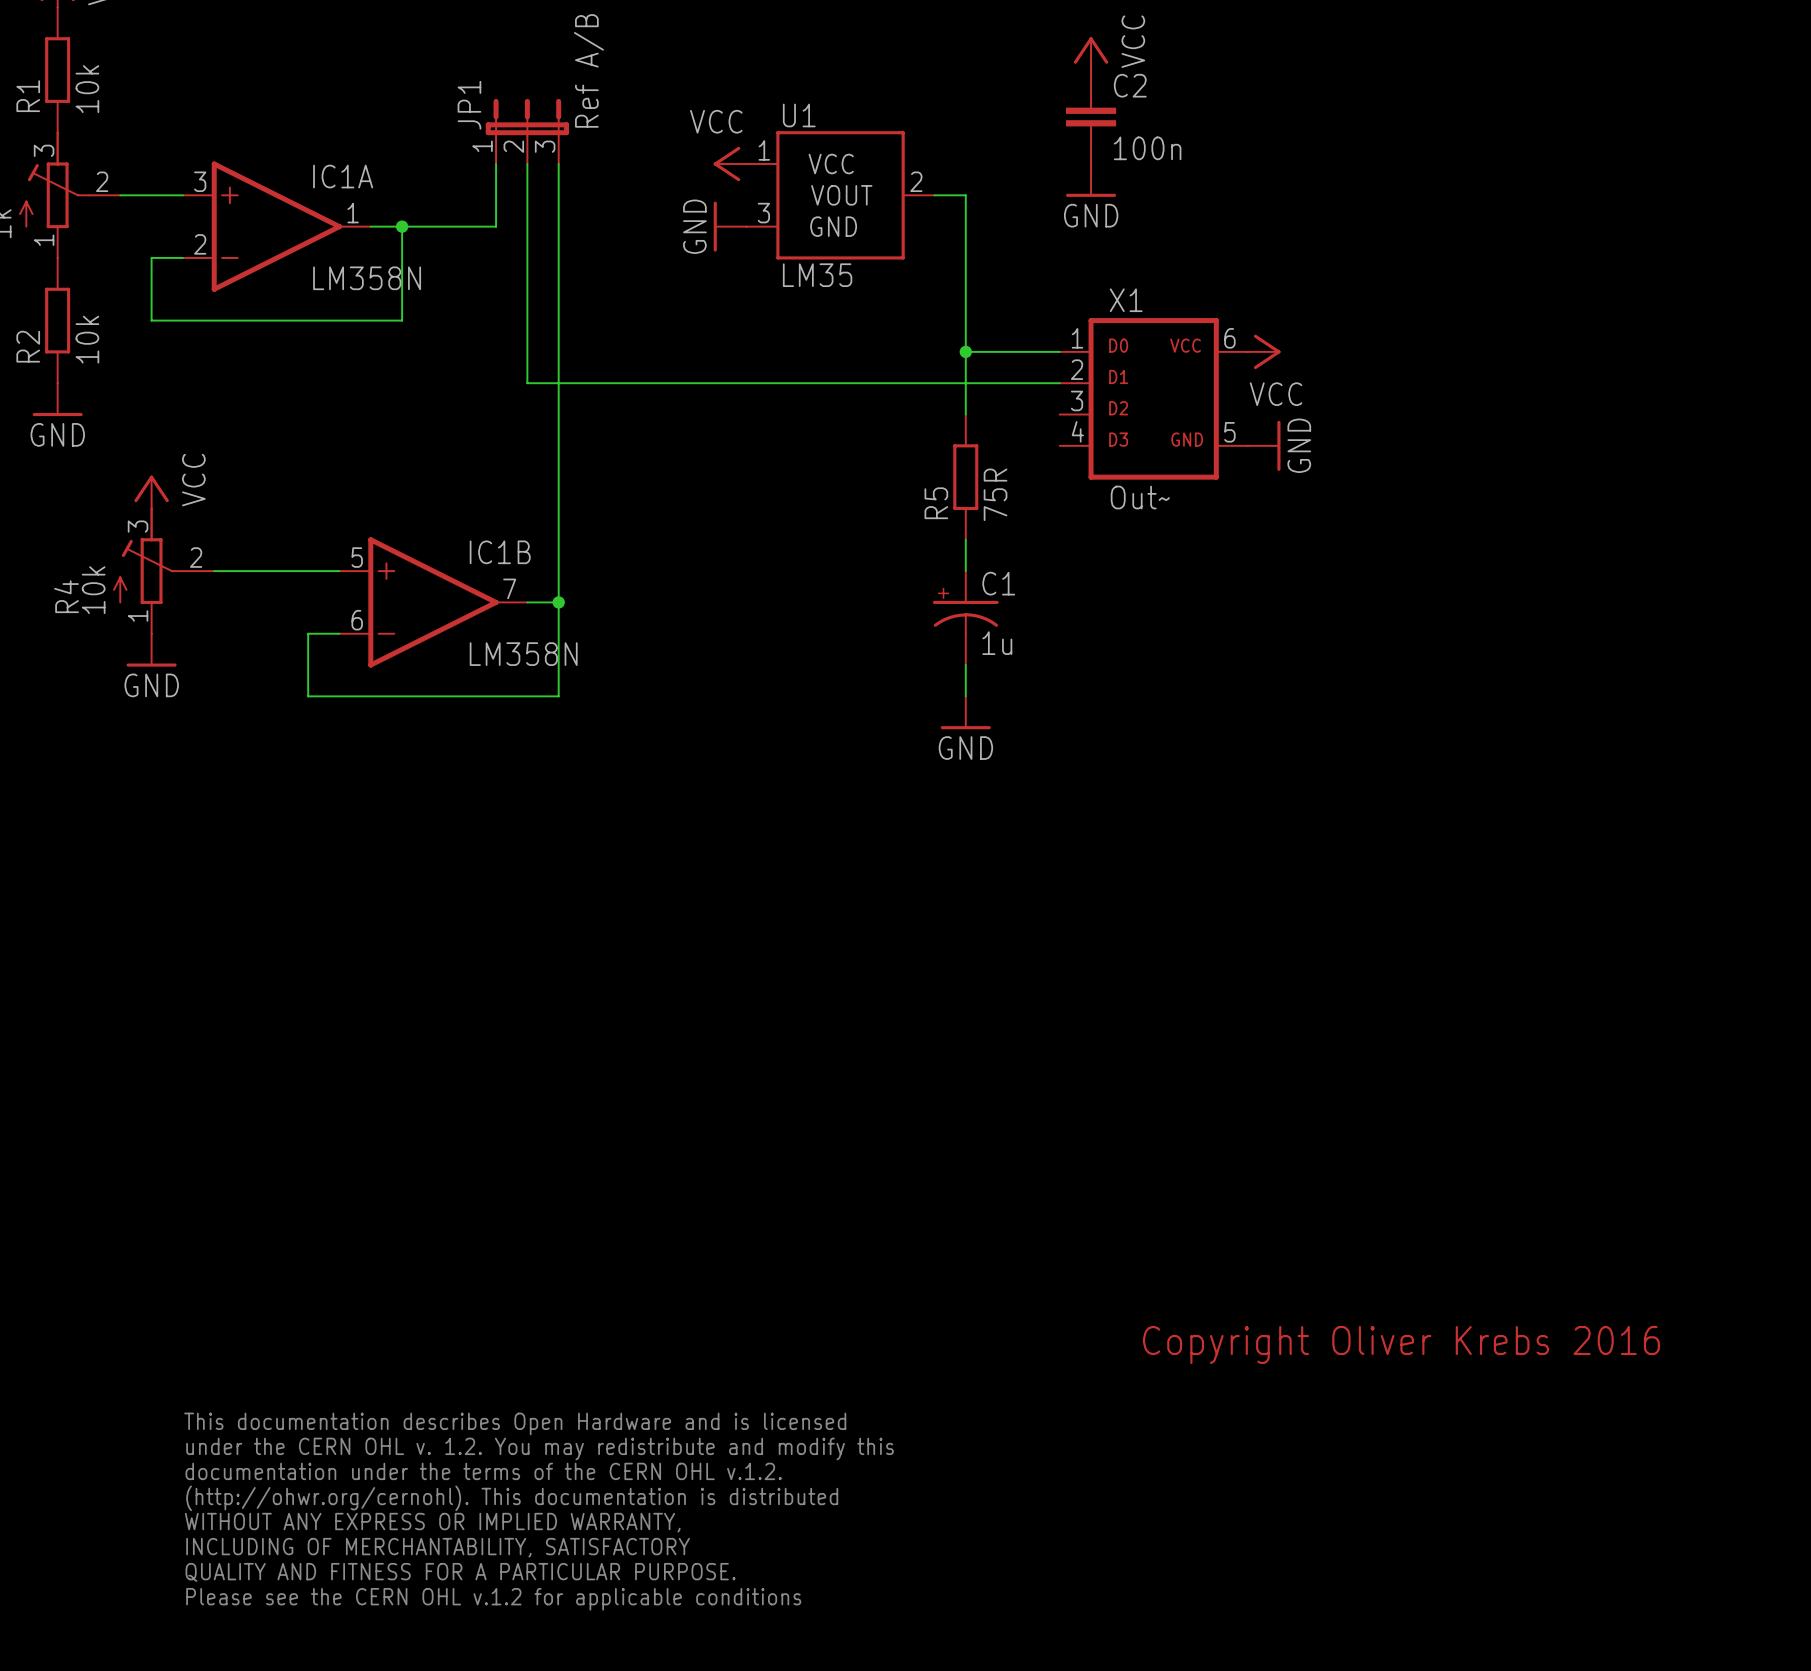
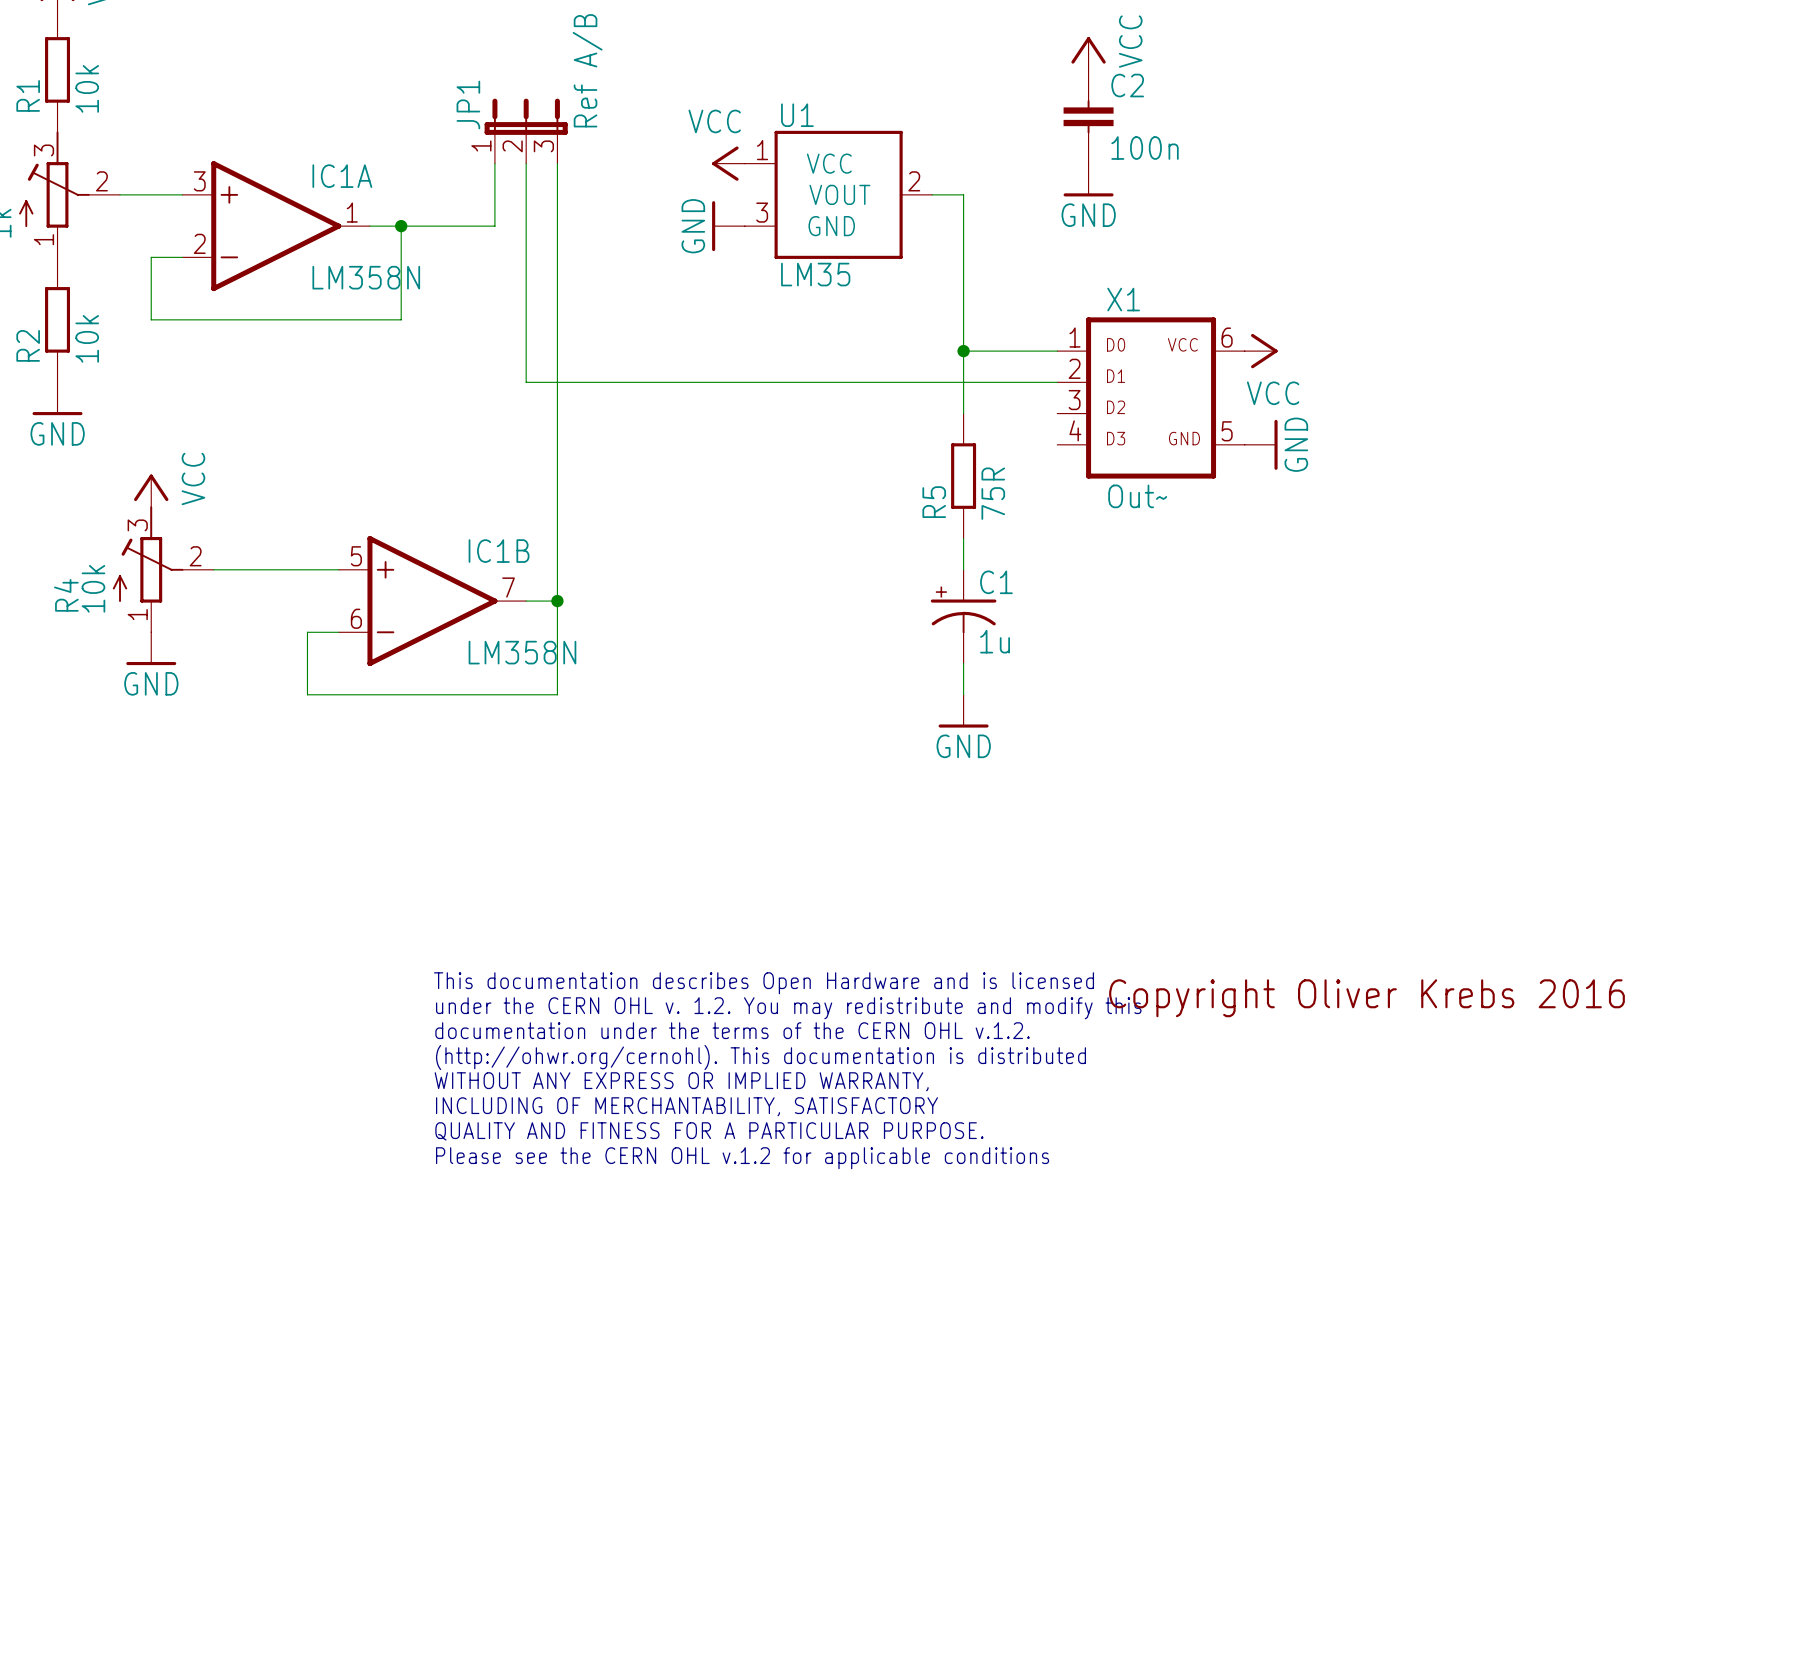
text: none -> This documentation describes Open Hardware and is licensed (764, 983)
text: none -> Copyright Oliver Krebs 2016 (1367, 998)
text: none -> under the CERN OHL v. 1.2. You may redistribute and modify this (788, 1008)
text: none -> documentation under the terms of the CERN OHL v.1.2. (732, 1030)
text: none -> (http://ohwr.org/cernohl). This documentation is distributed (760, 1057)
text: none -> WITHOUT ANY EXPRESS OR IMPLIED WARRANTY, (681, 1081)
text: none -> INCLUDING OF MERCHANTABILITY, SATISFACTORY (687, 1106)
text: none -> QUALITY AND FITNESS FOR A PARTICULAR PURPOSE. (709, 1131)
text: none -> Please see the CERN OHL v.1.2 for applicable conditions (742, 1158)
text: Copyright Oliver Krebs 2016 (1401, 1345) -> none
text: This documentation describes Open Hardware and is licensed (515, 1423) -> none
text: under the CERN OHL v. 1.2. You may redistribute and modify this (540, 1448) -> none
text: documentation under the terms of the CERN OHL v.1.2. (483, 1471) -> none
text: (http://ohwr.org/cernohl). This documentation is distributed (512, 1498) -> none
text: WITHOUT ANY EXPRESS OR IMPLIED WARRANTY, (432, 1522) -> none
text: INCLUDING OF MERCHANTABILITY, SATISFACTORY (438, 1547) -> none
text: QUALITY AND FITNESS FOR A PARTICULAR PURPOSE. (460, 1572) -> none
text: Please see the CERN OHL v.1.2 for applicable conditions (493, 1599) -> none

